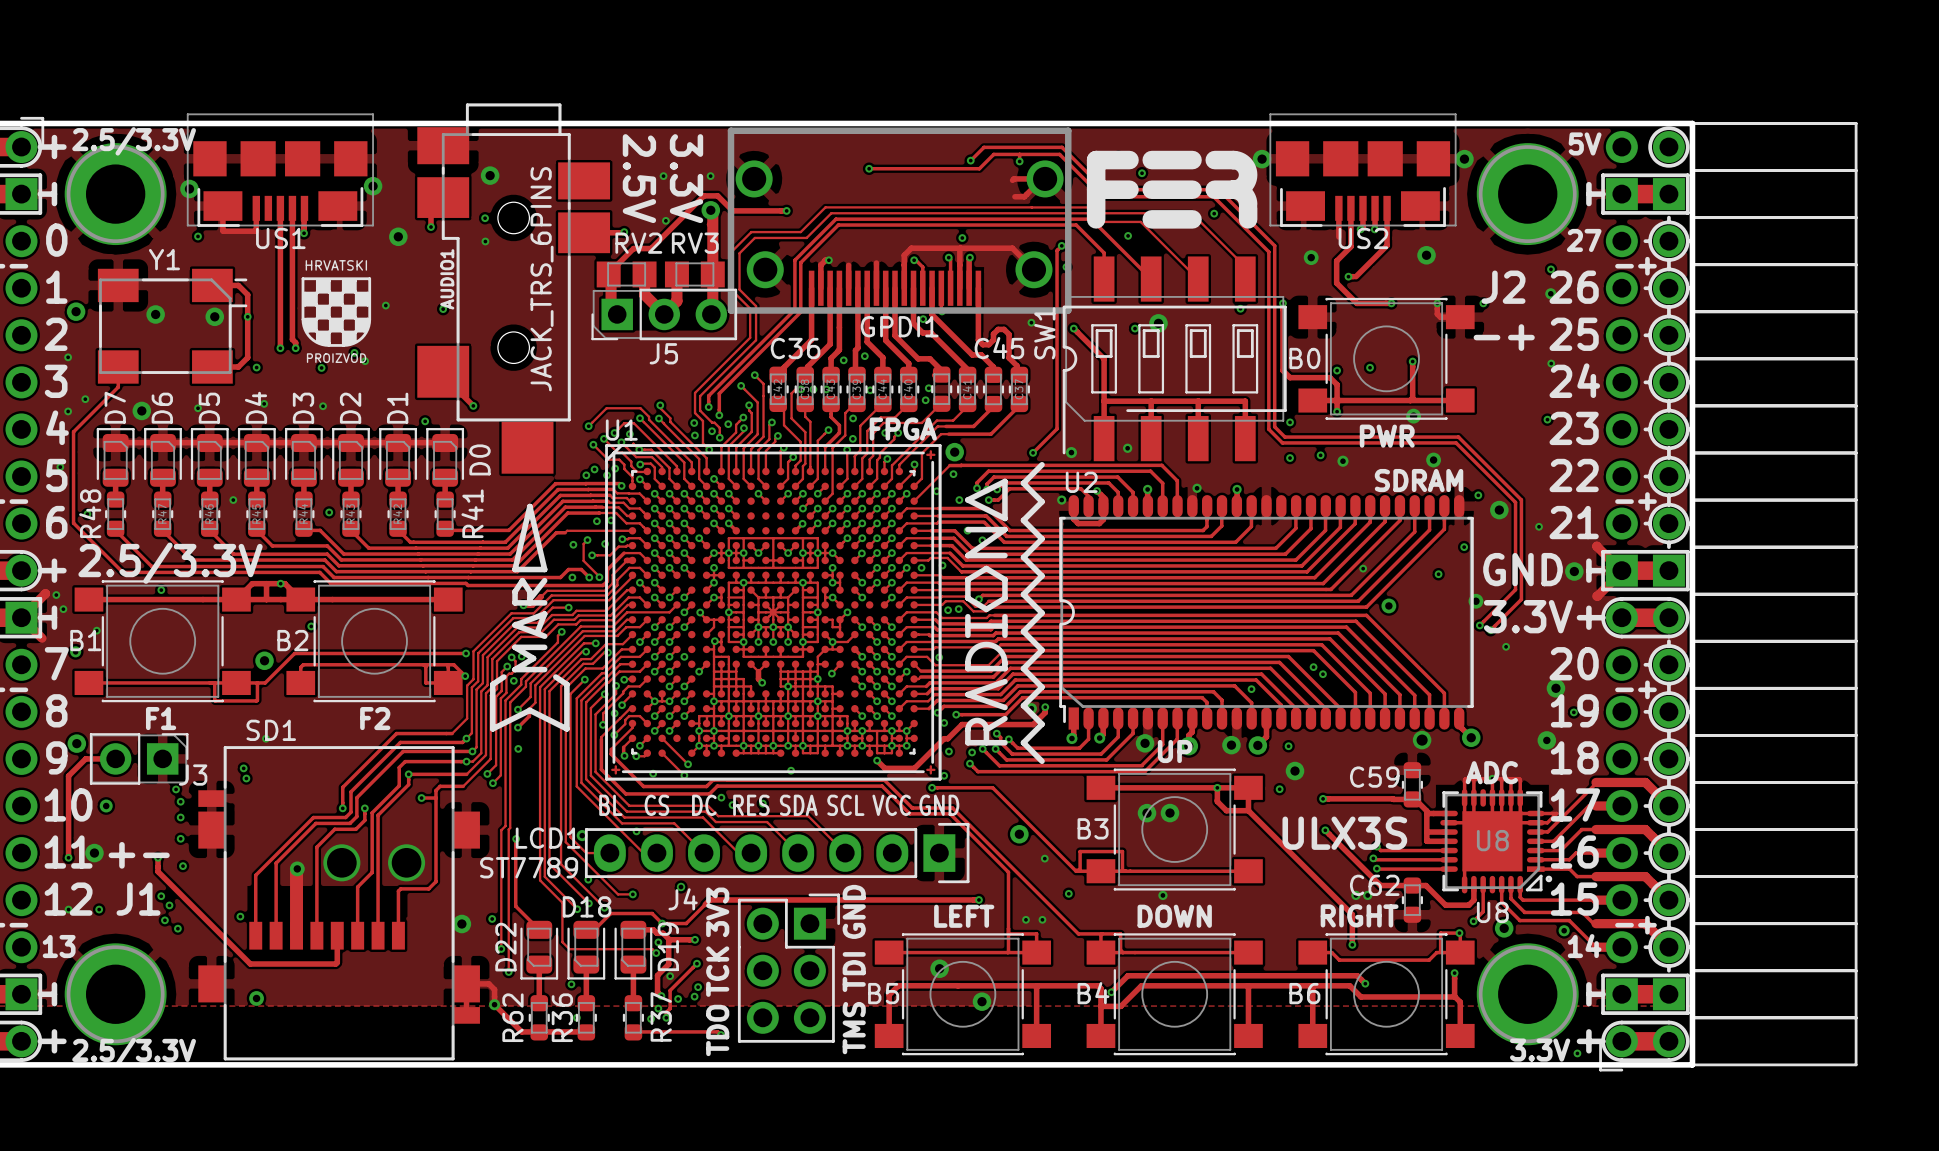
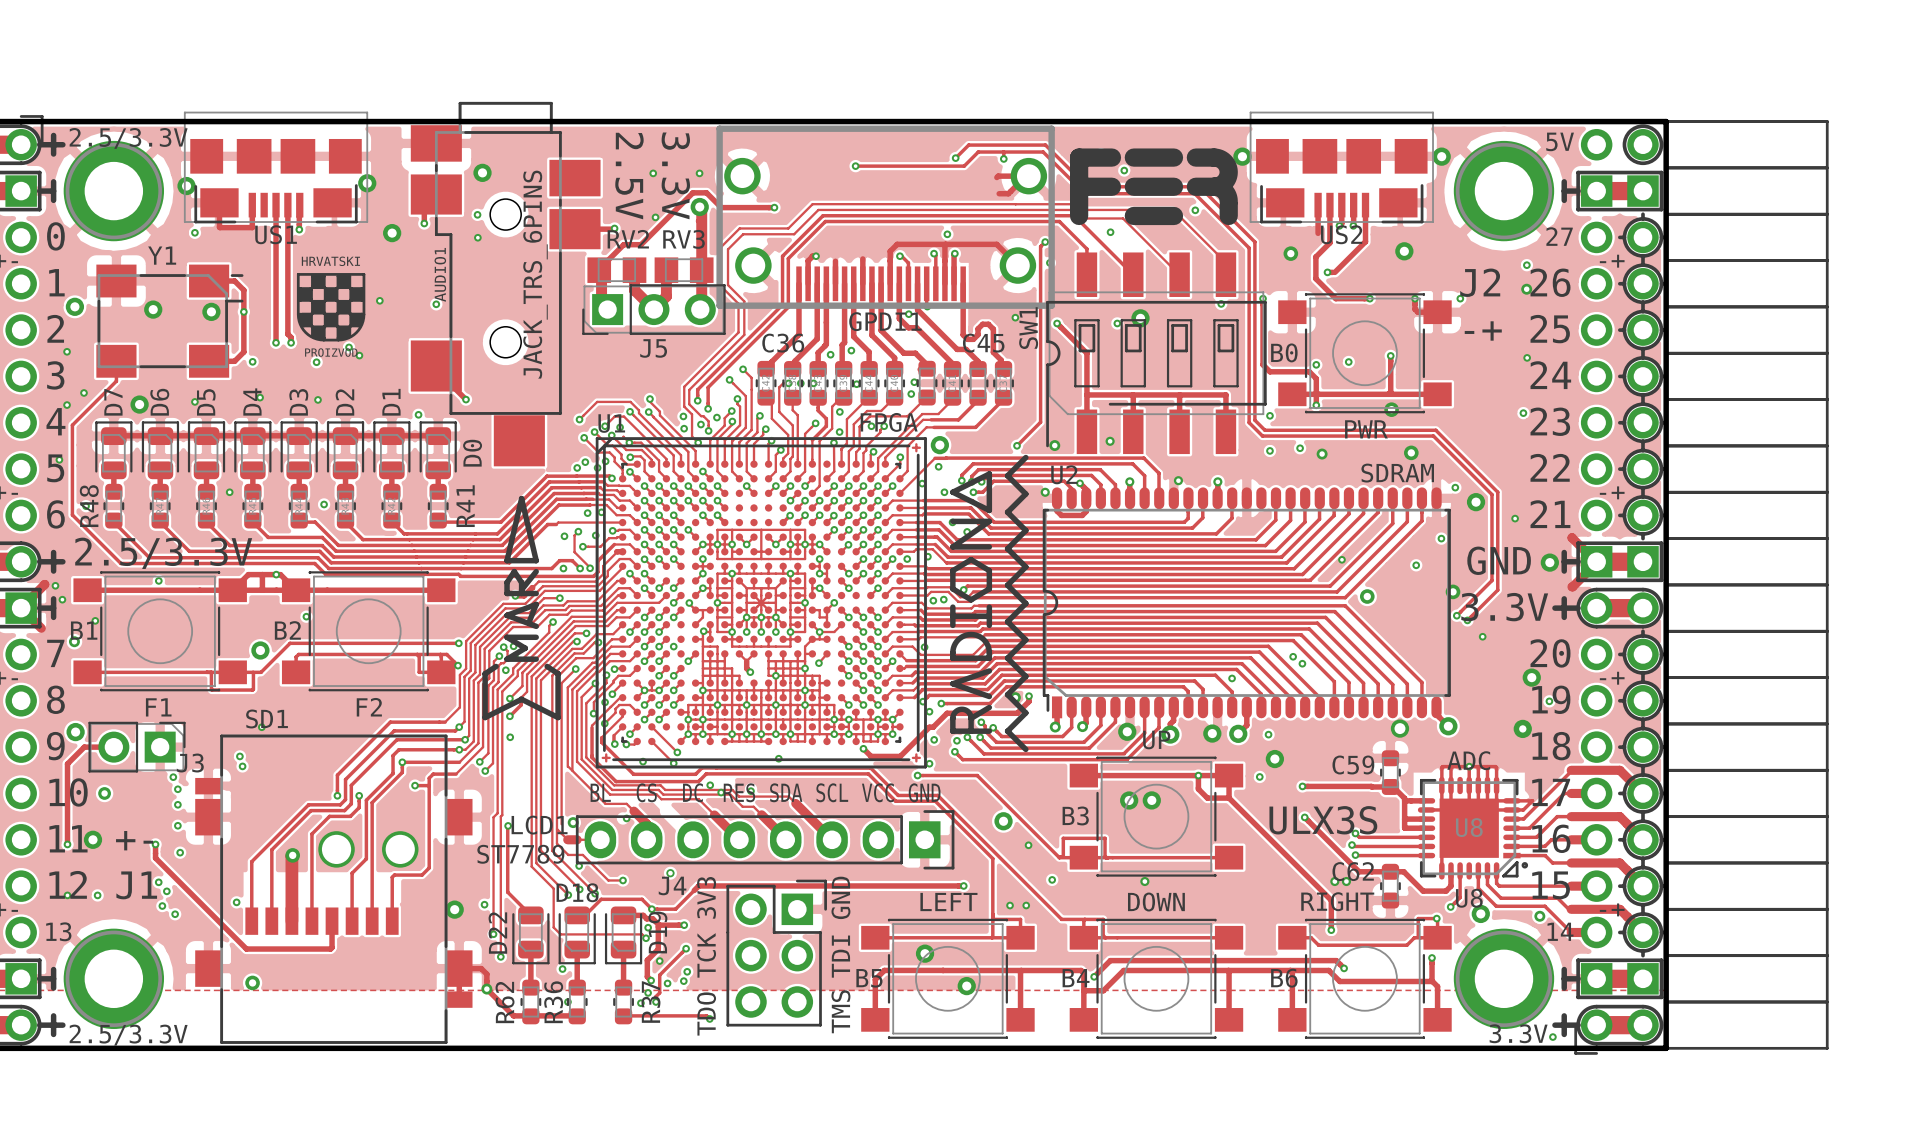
track: (595, 769) (595, 771) (629, 805) (707, 805) (718, 816) (808, 816) -> (586, 757) (614, 785) (660, 785) (665, 789) (732, 789) (739, 796) (788, 796) (795, 803)
track: (590, 771) (590, 775) (626, 811) (705, 811) (715, 822) (767, 822) (798, 853) -> (581, 759) (612, 789) (658, 789) (663, 794) (730, 794) (742, 806) (753, 806) (785, 839)
track: (586, 773) (586, 779) (624, 817) (703, 817) (738, 853) (751, 853) -> (577, 761) (610, 794) (656, 794) (661, 799) (698, 799) (714, 814)
track: (576, 778) (576, 786) (643, 853) (647, 853) -> none
track: (615, 816) (622, 823) (674, 823) (704, 853) -> (605, 803) (626, 803) (646, 823) (646, 839)
track width: thin (808, 816) (845, 853) -> thick (795, 803) (832, 839)
track: none -> (714, 814) (739, 839)
track: (570, 837) (586, 853) -> (567, 839) (577, 839)
track: (576, 853) (592, 868) -> (556, 829) (556, 843) (568, 854) (582, 854)

